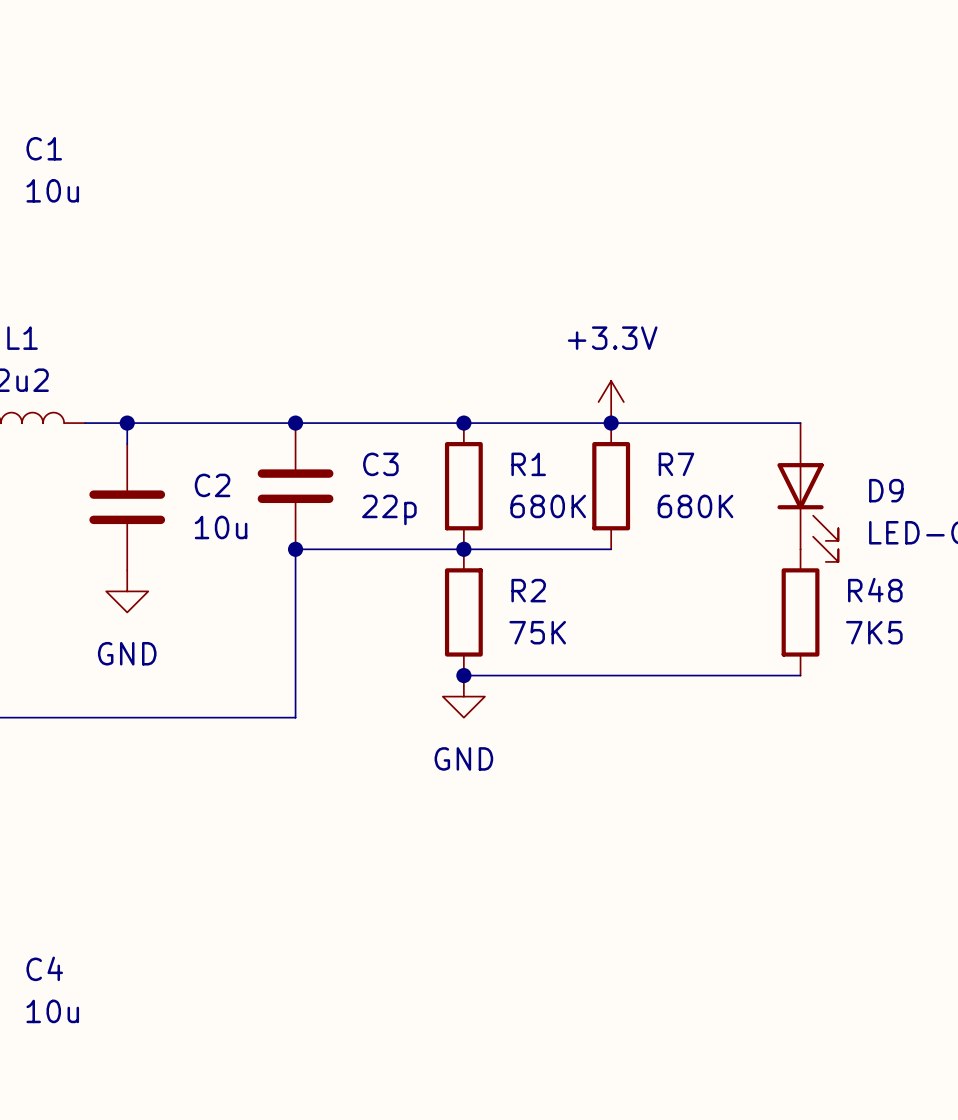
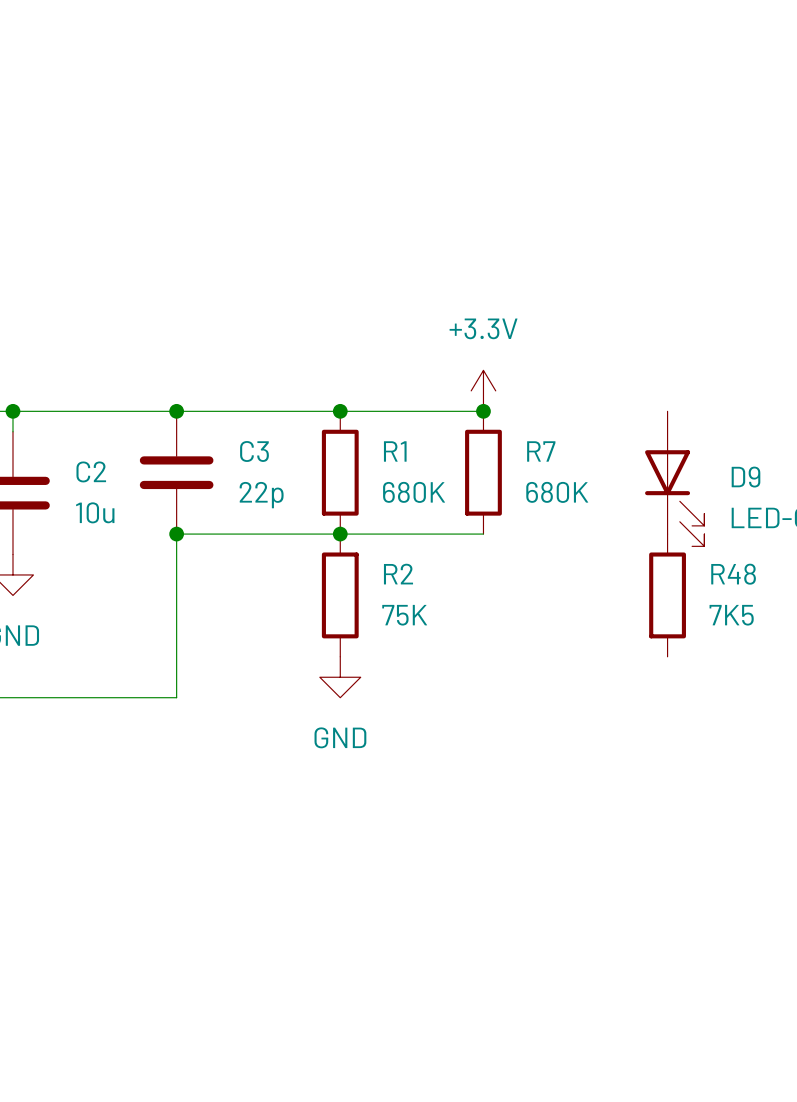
wire: (611, 423) (800, 423) -> none
wire: (463, 675) (800, 675) -> none
junction: (463, 675) -> none

